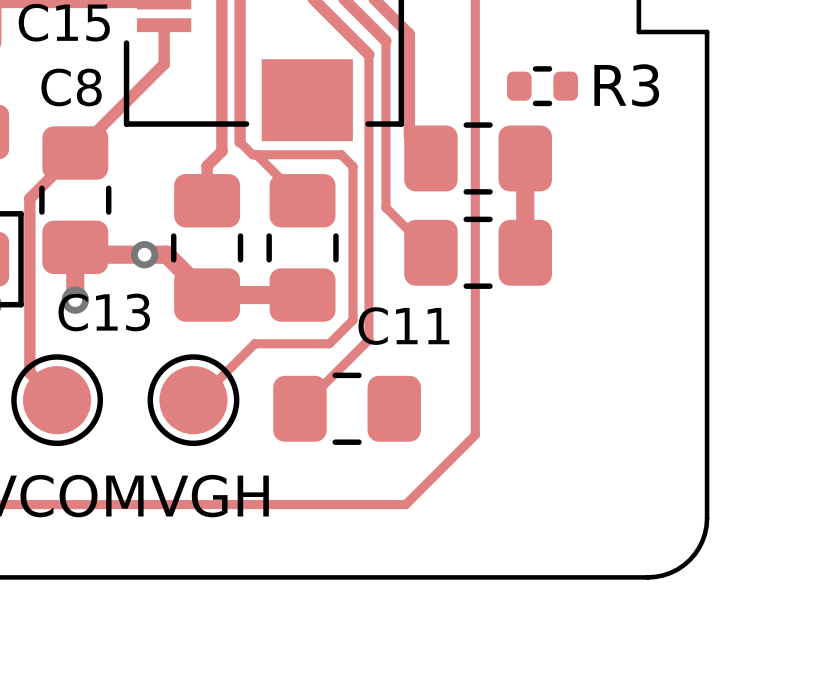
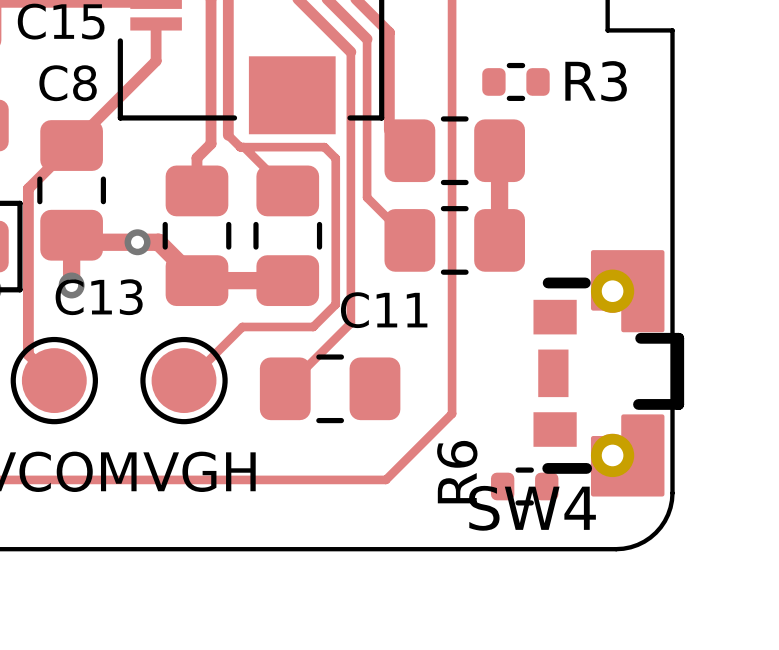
SW4: none -> (608, 373)
R6: none -> (524, 486)

